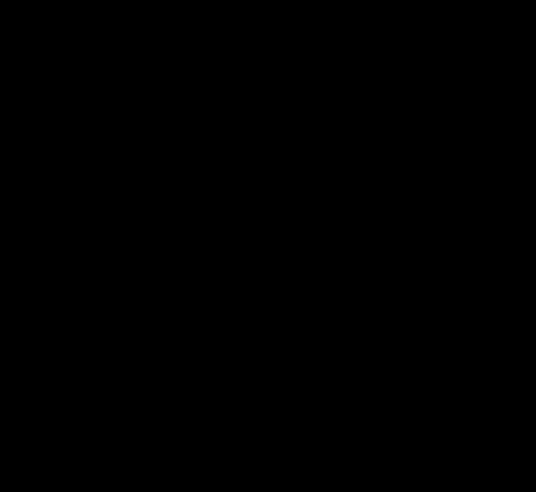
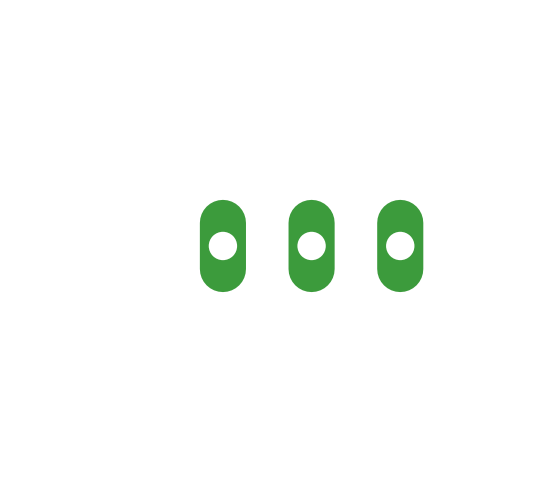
part: none -> (311, 245)

